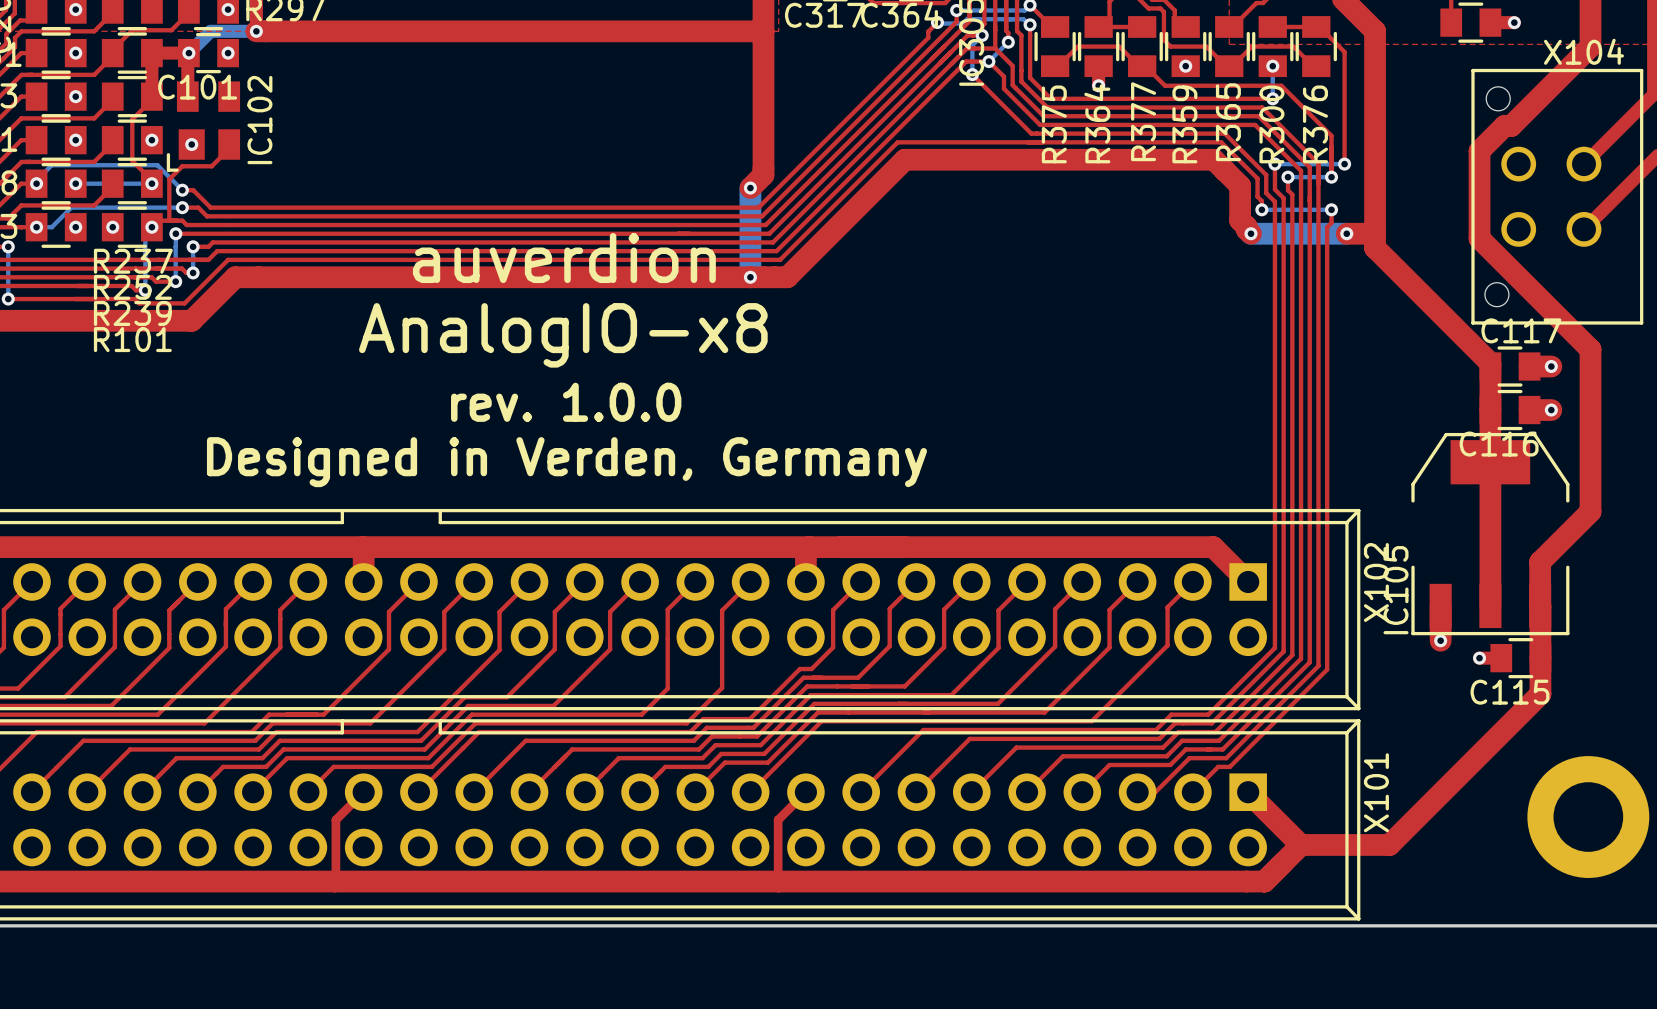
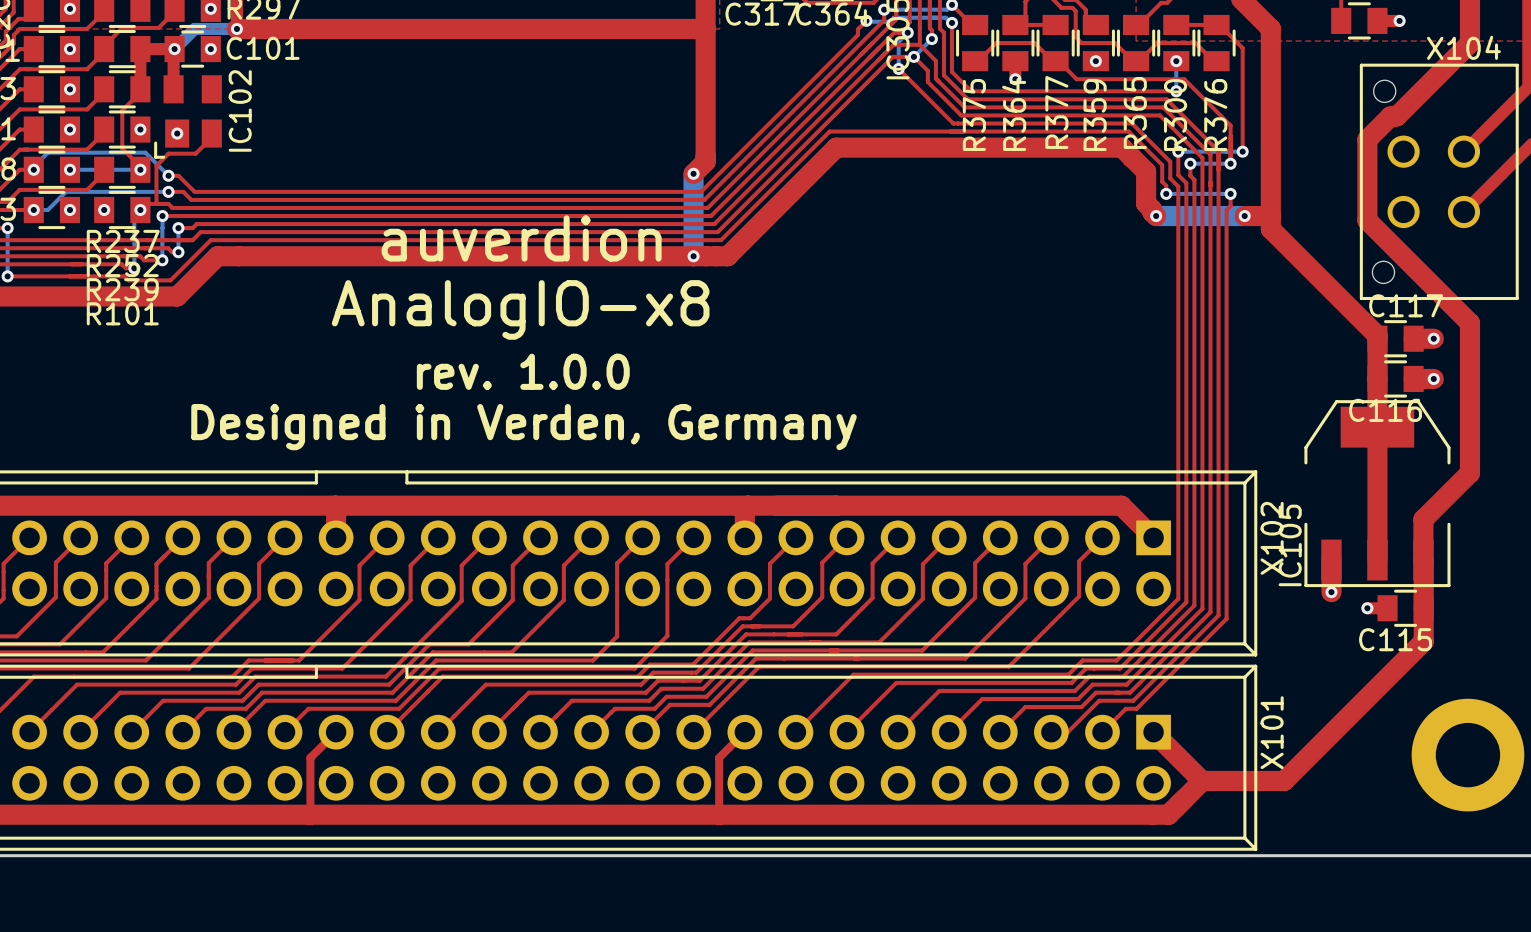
C101 name position: C101 (197, 87) -> C101 (263, 48)

